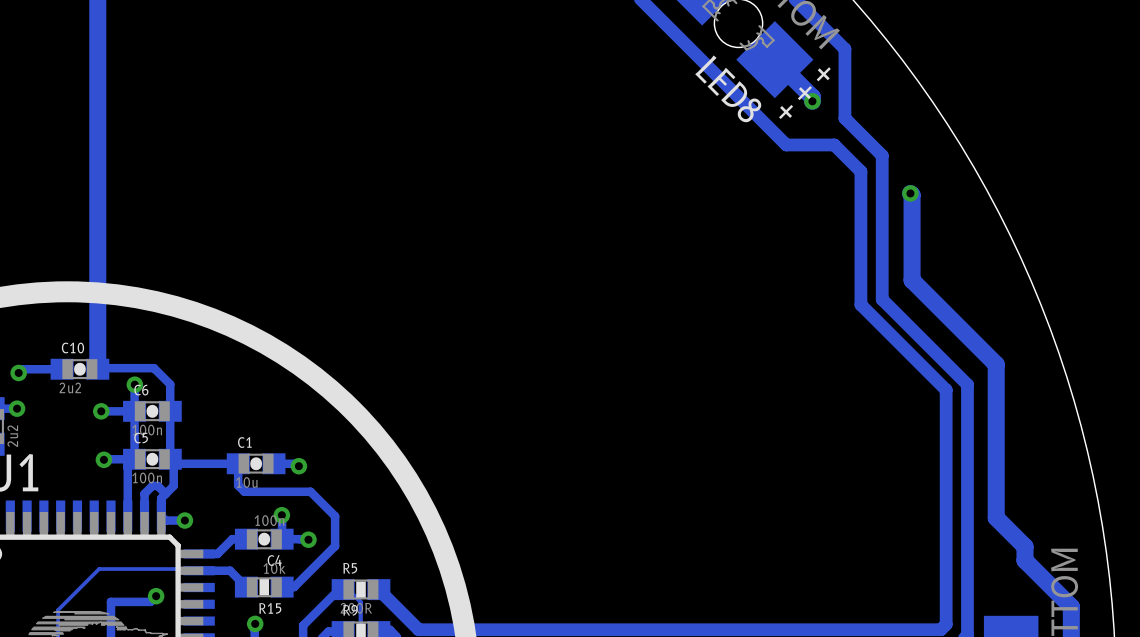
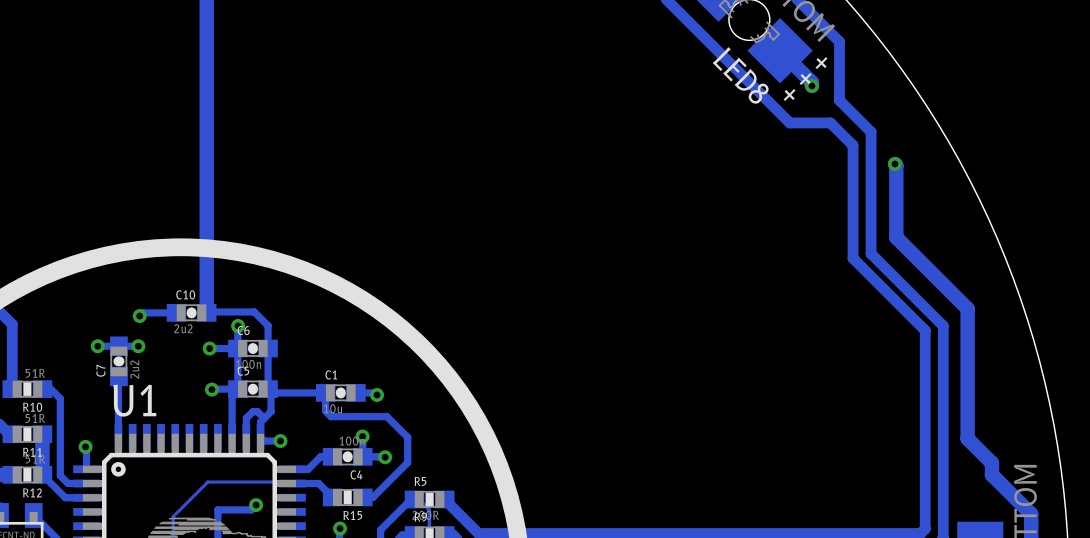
C5 value: 100n (147, 477) -> none
R15 value: 10k (274, 568) -> none

